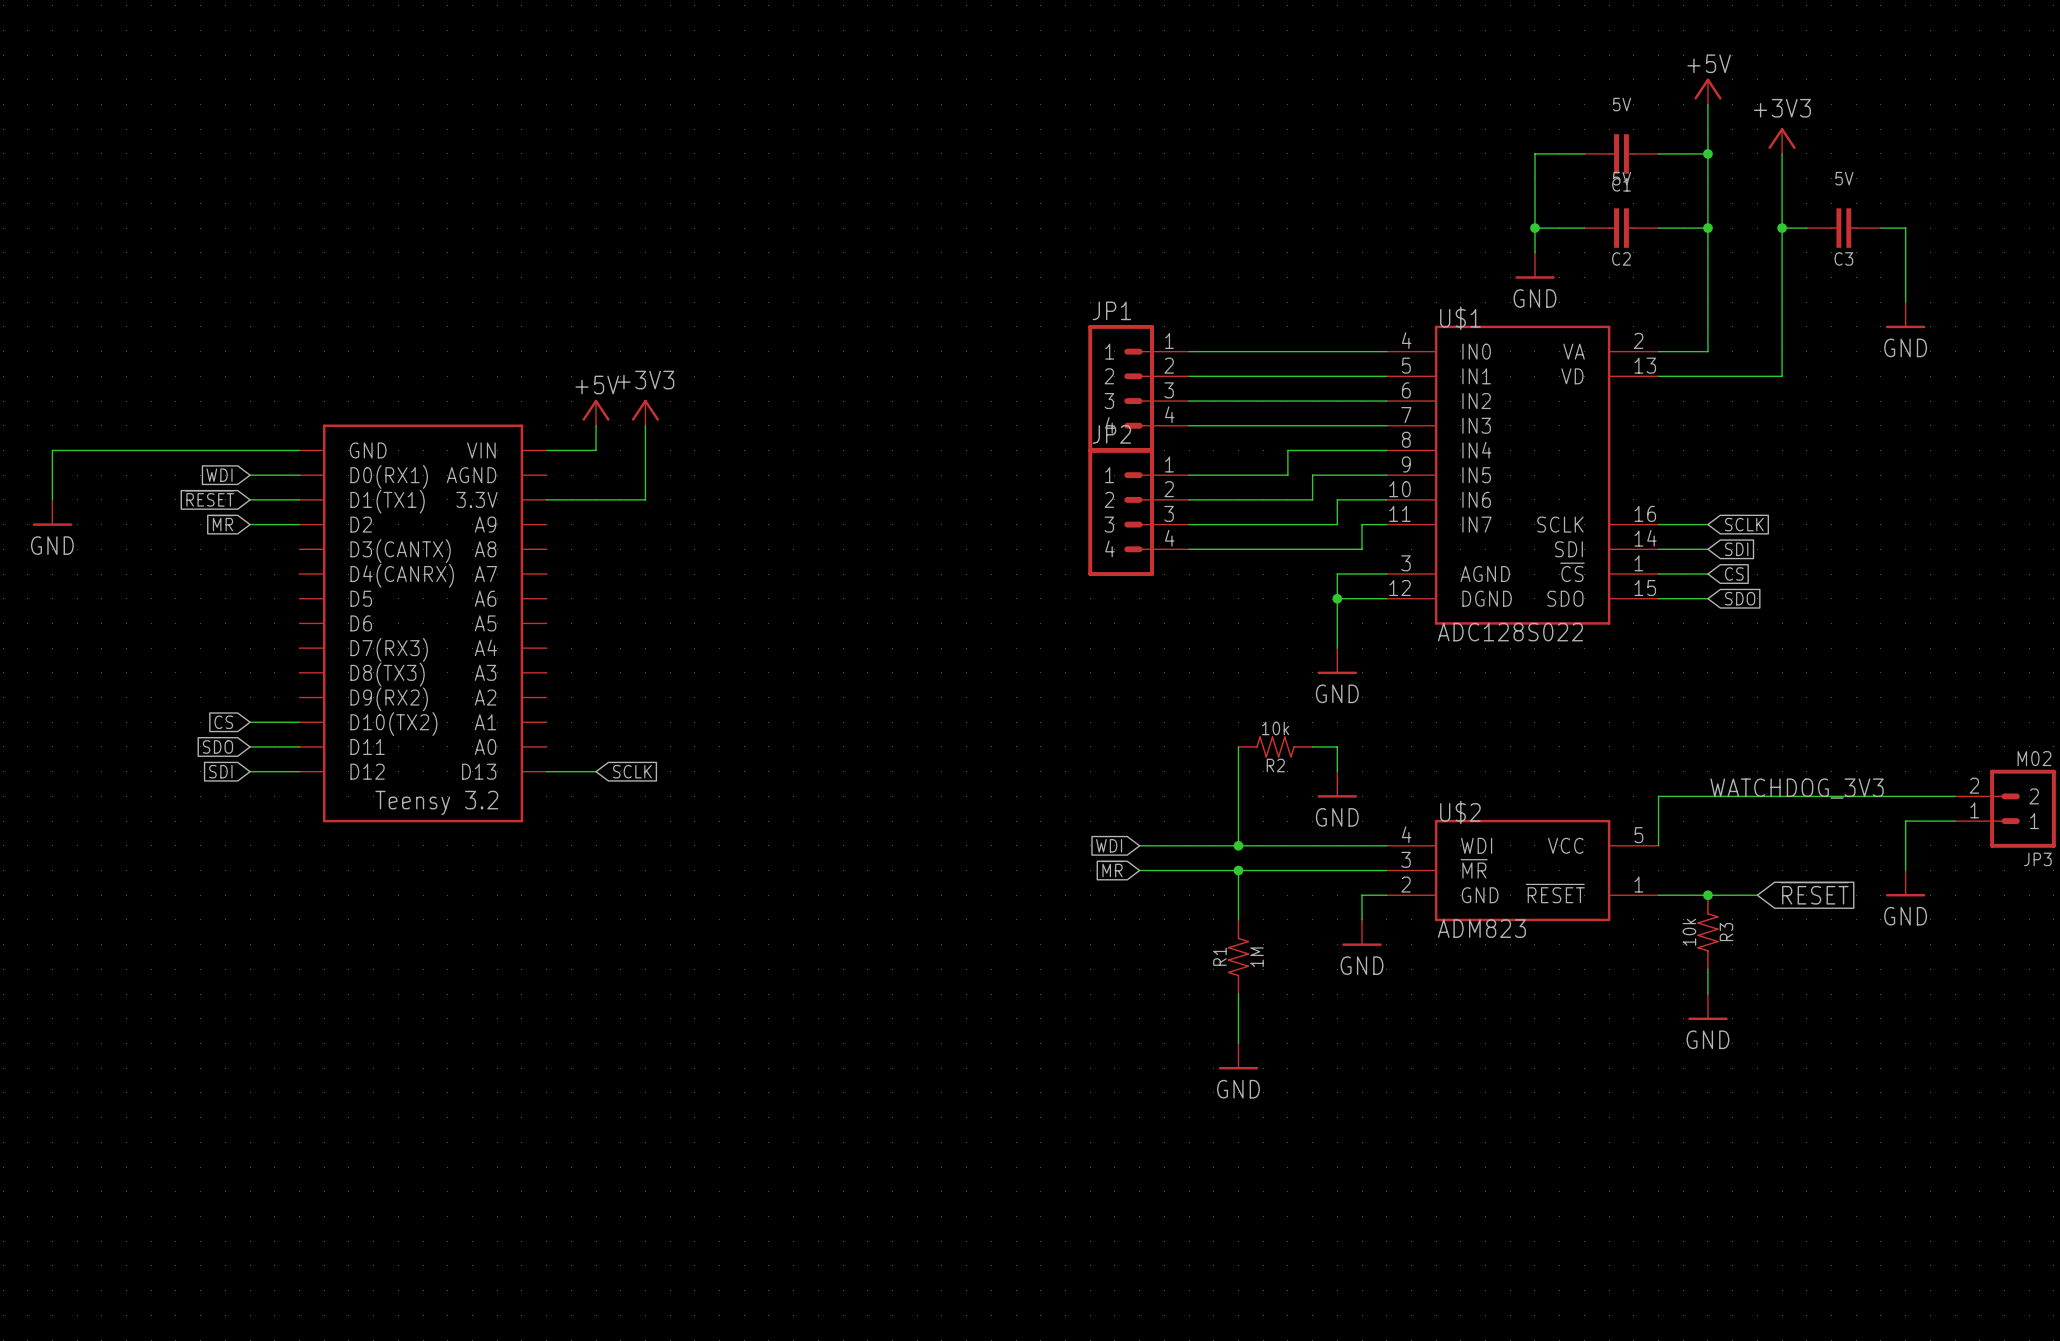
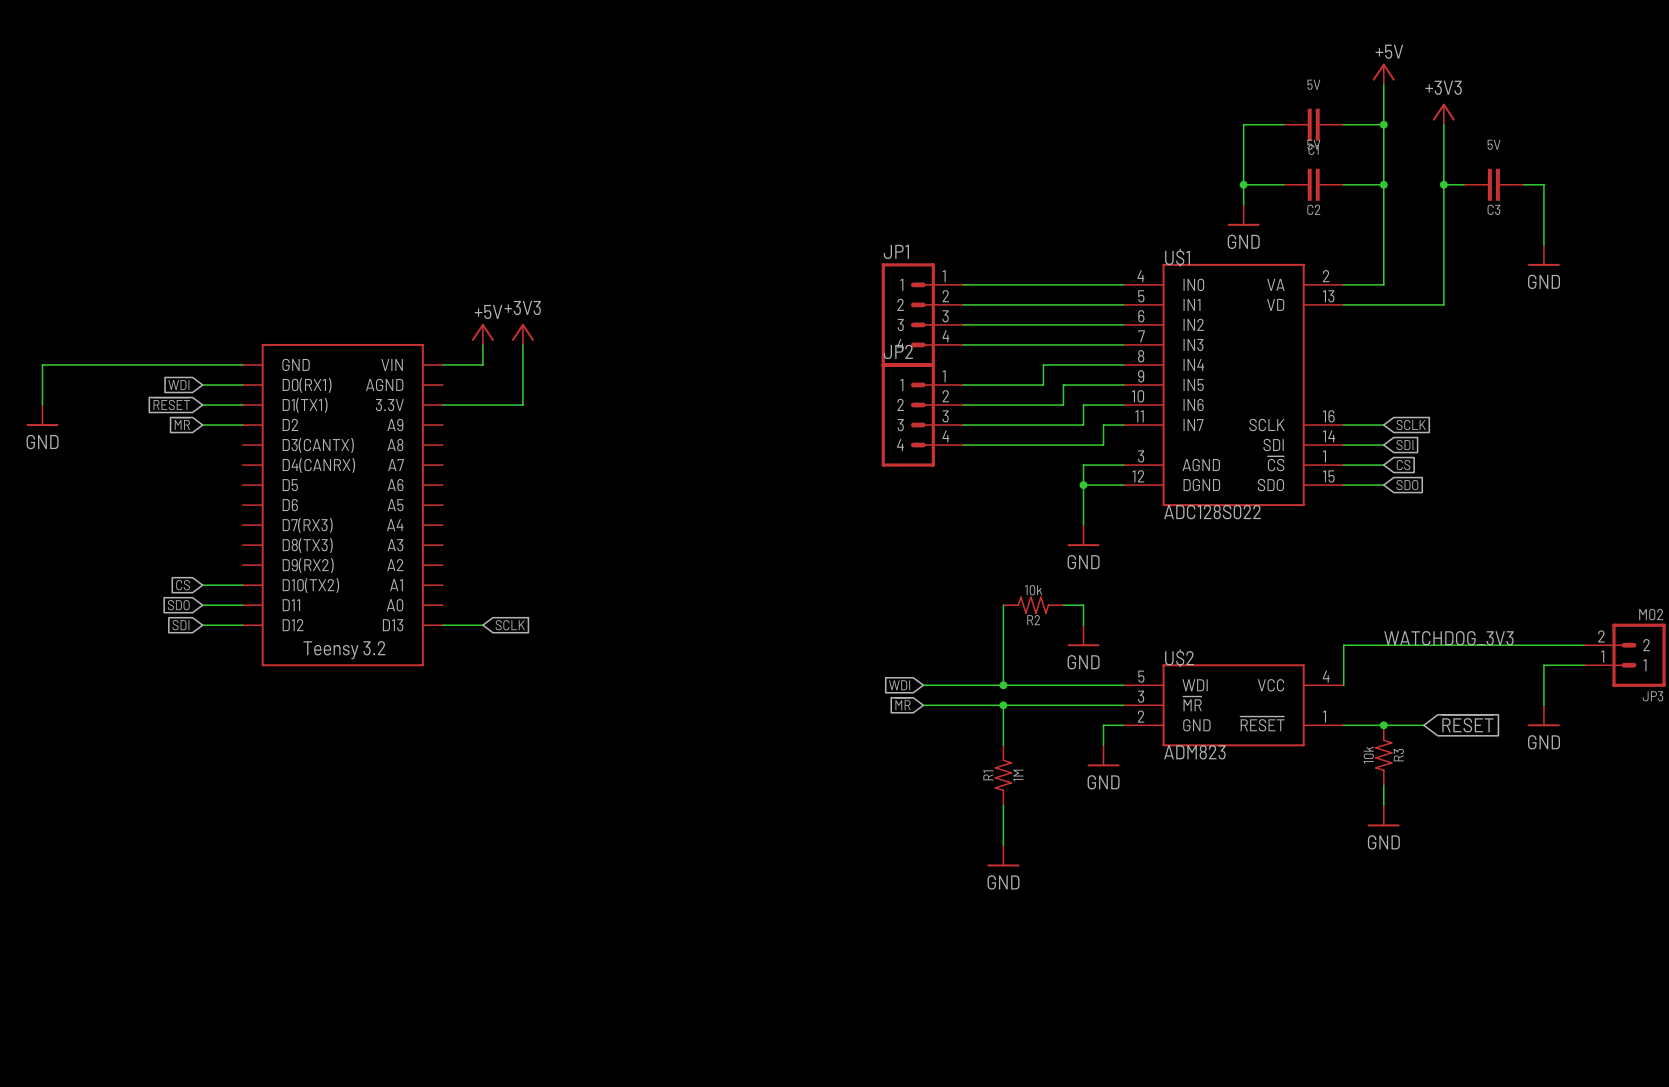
U$2 pin number: 4 (1406, 834) -> 5 (1141, 676)
U$2 pin number: 5 (1638, 835) -> 4 (1326, 676)

